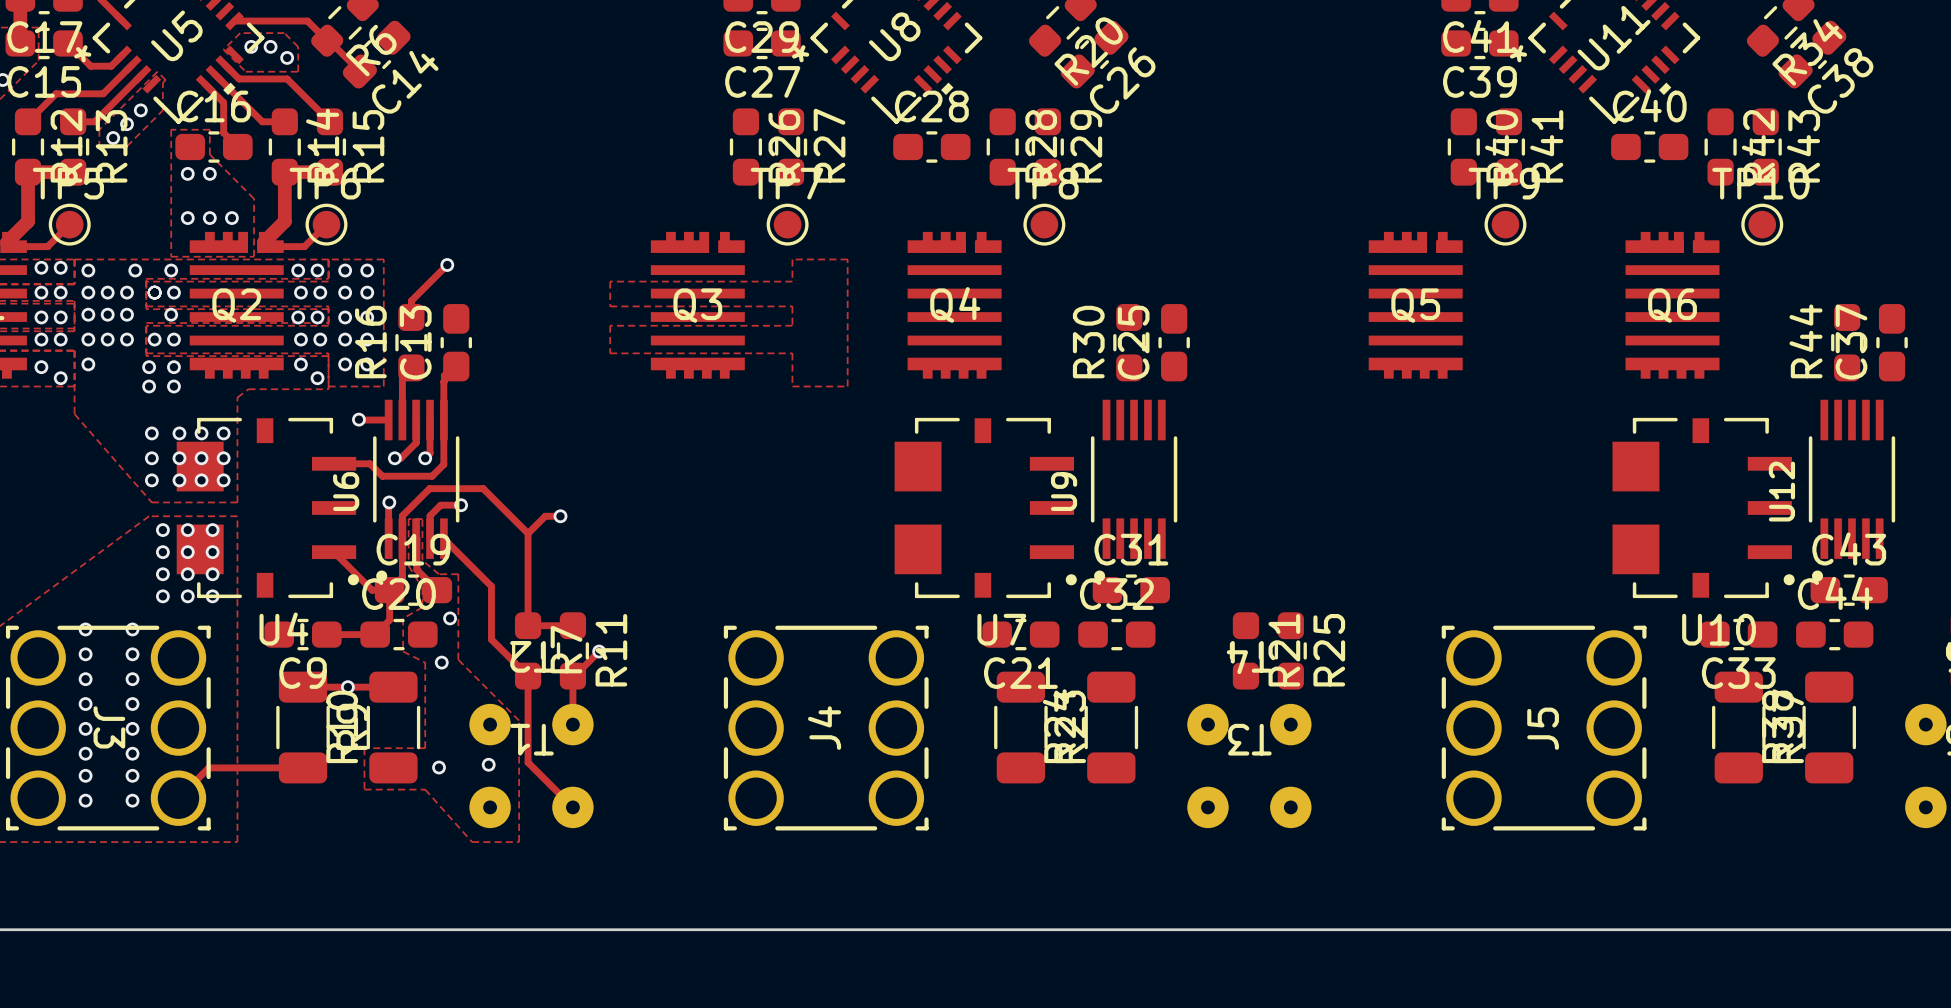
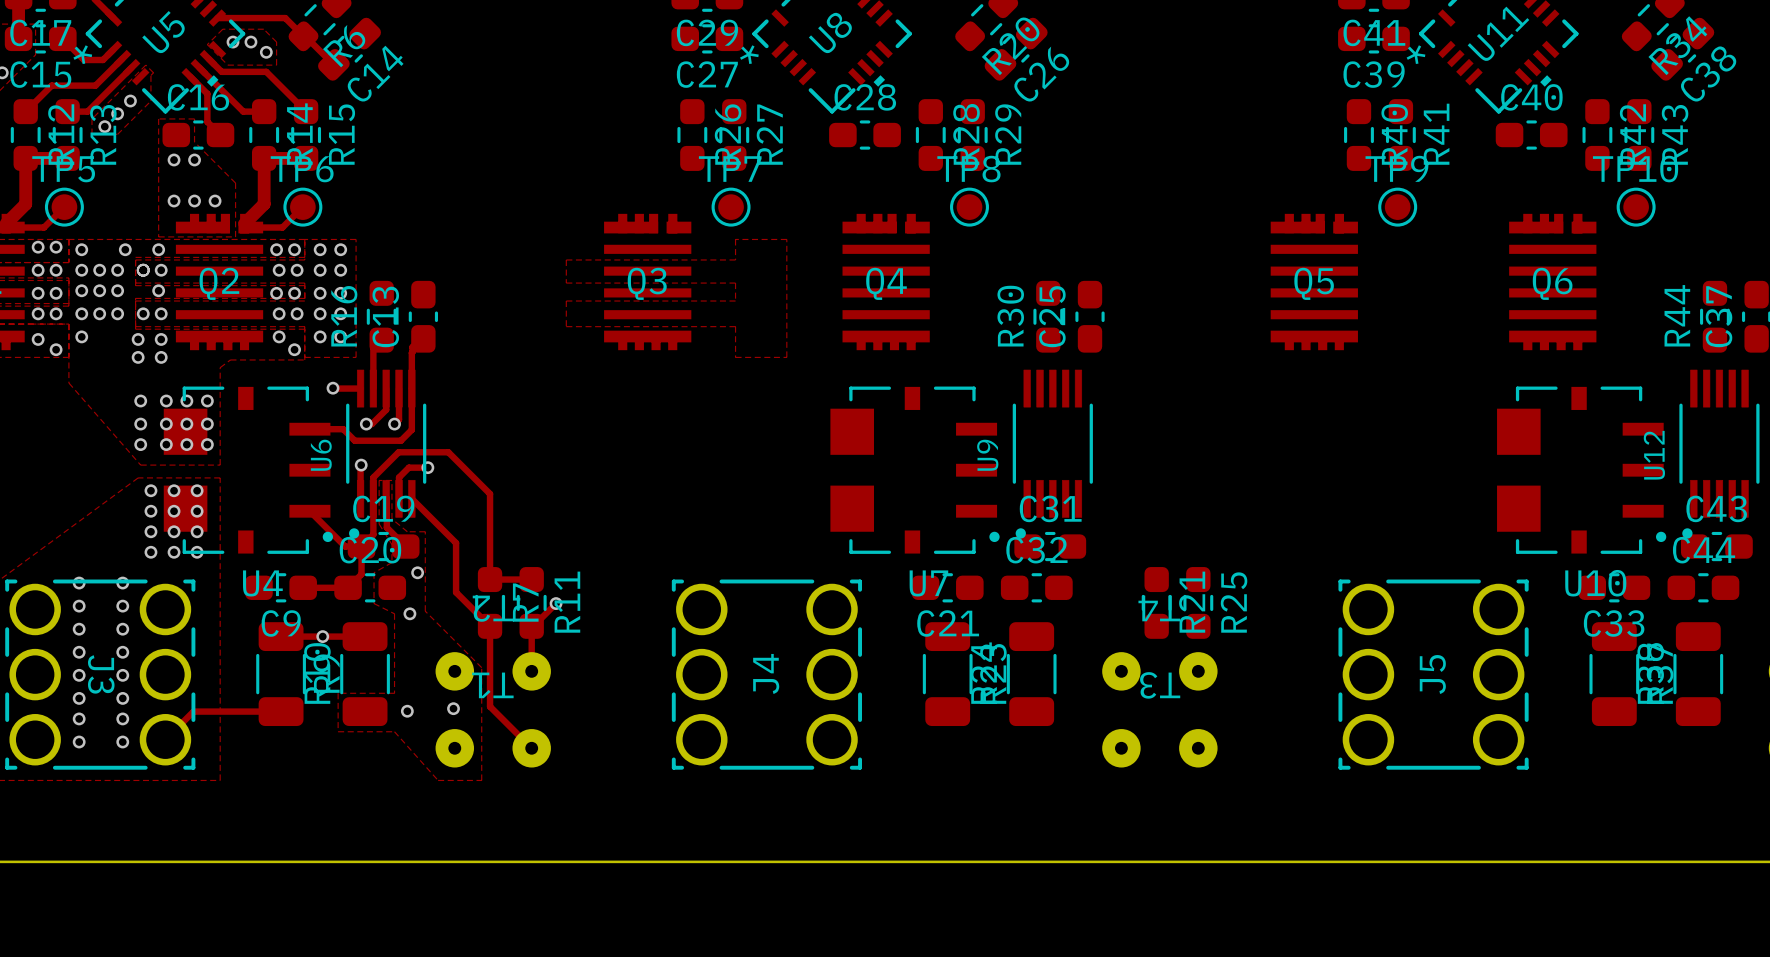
track: (447, 265) (411, 300) (411, 317) -> none
via: (447, 265) -> none
track: (560, 516) (545, 516) (528, 533) -> none
via: (560, 516) -> none

